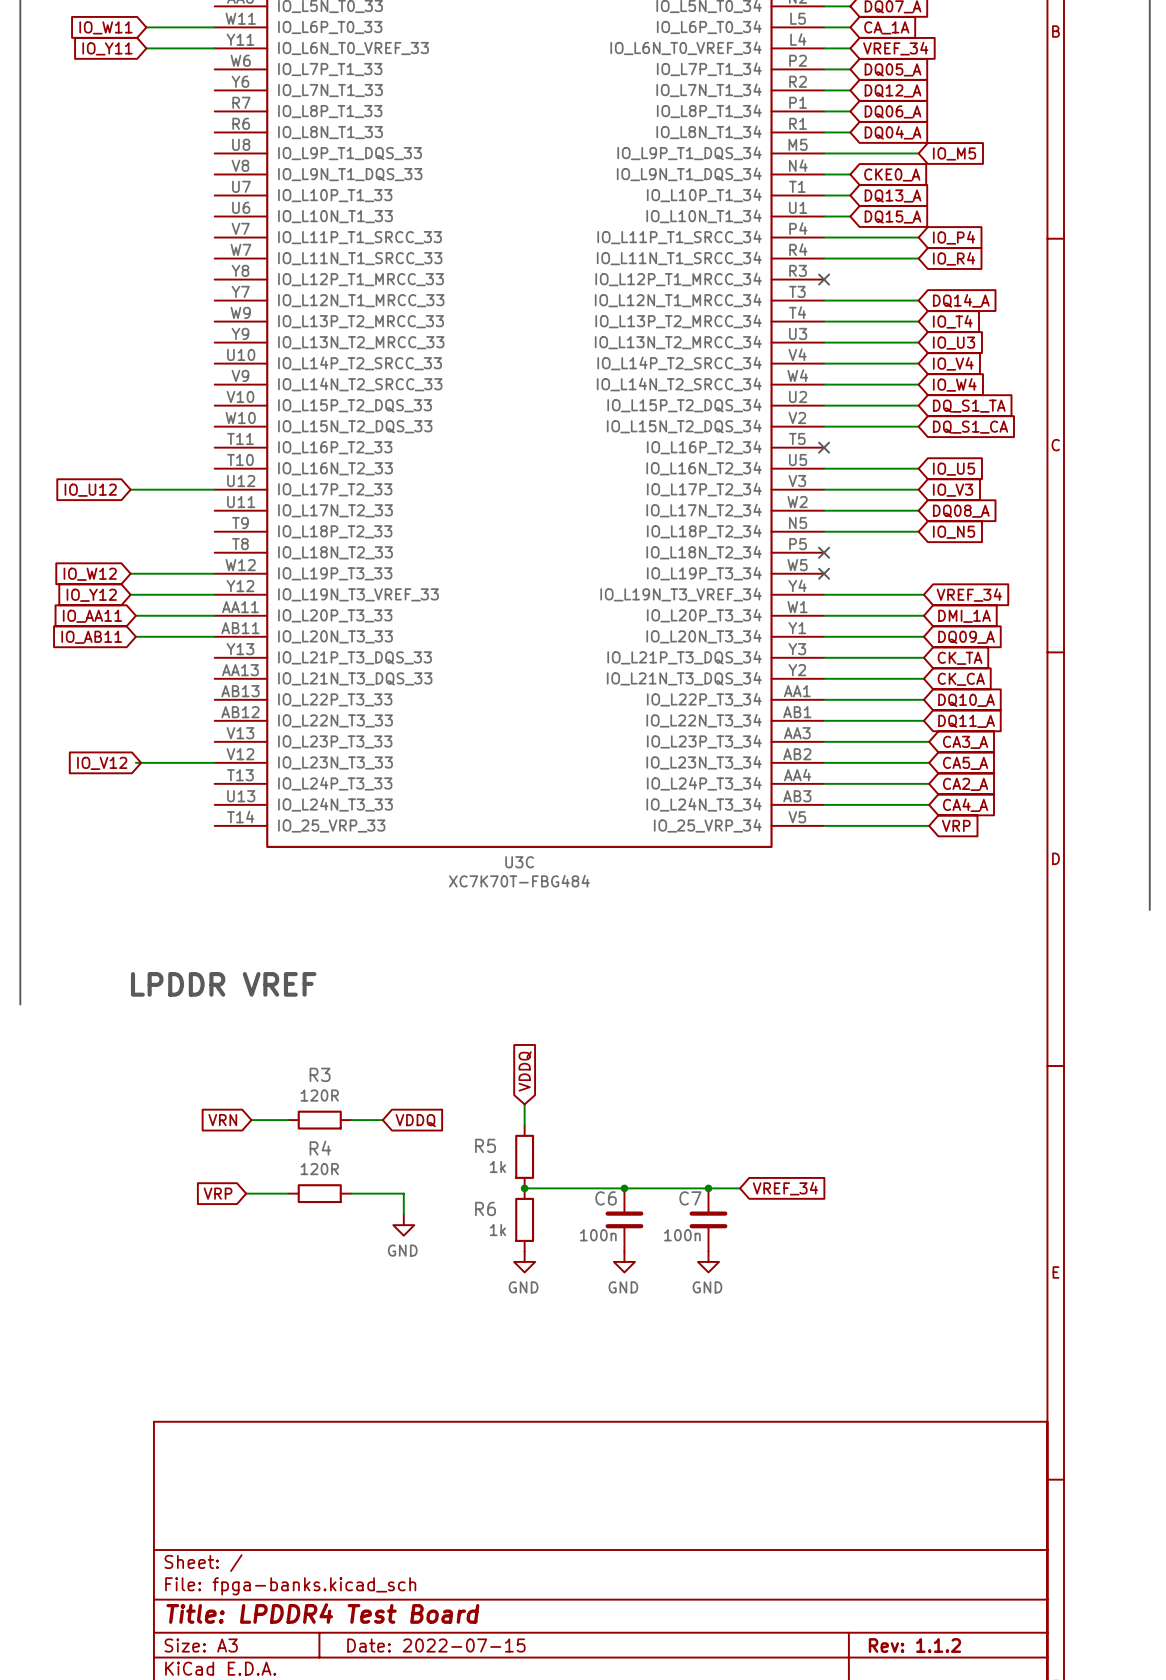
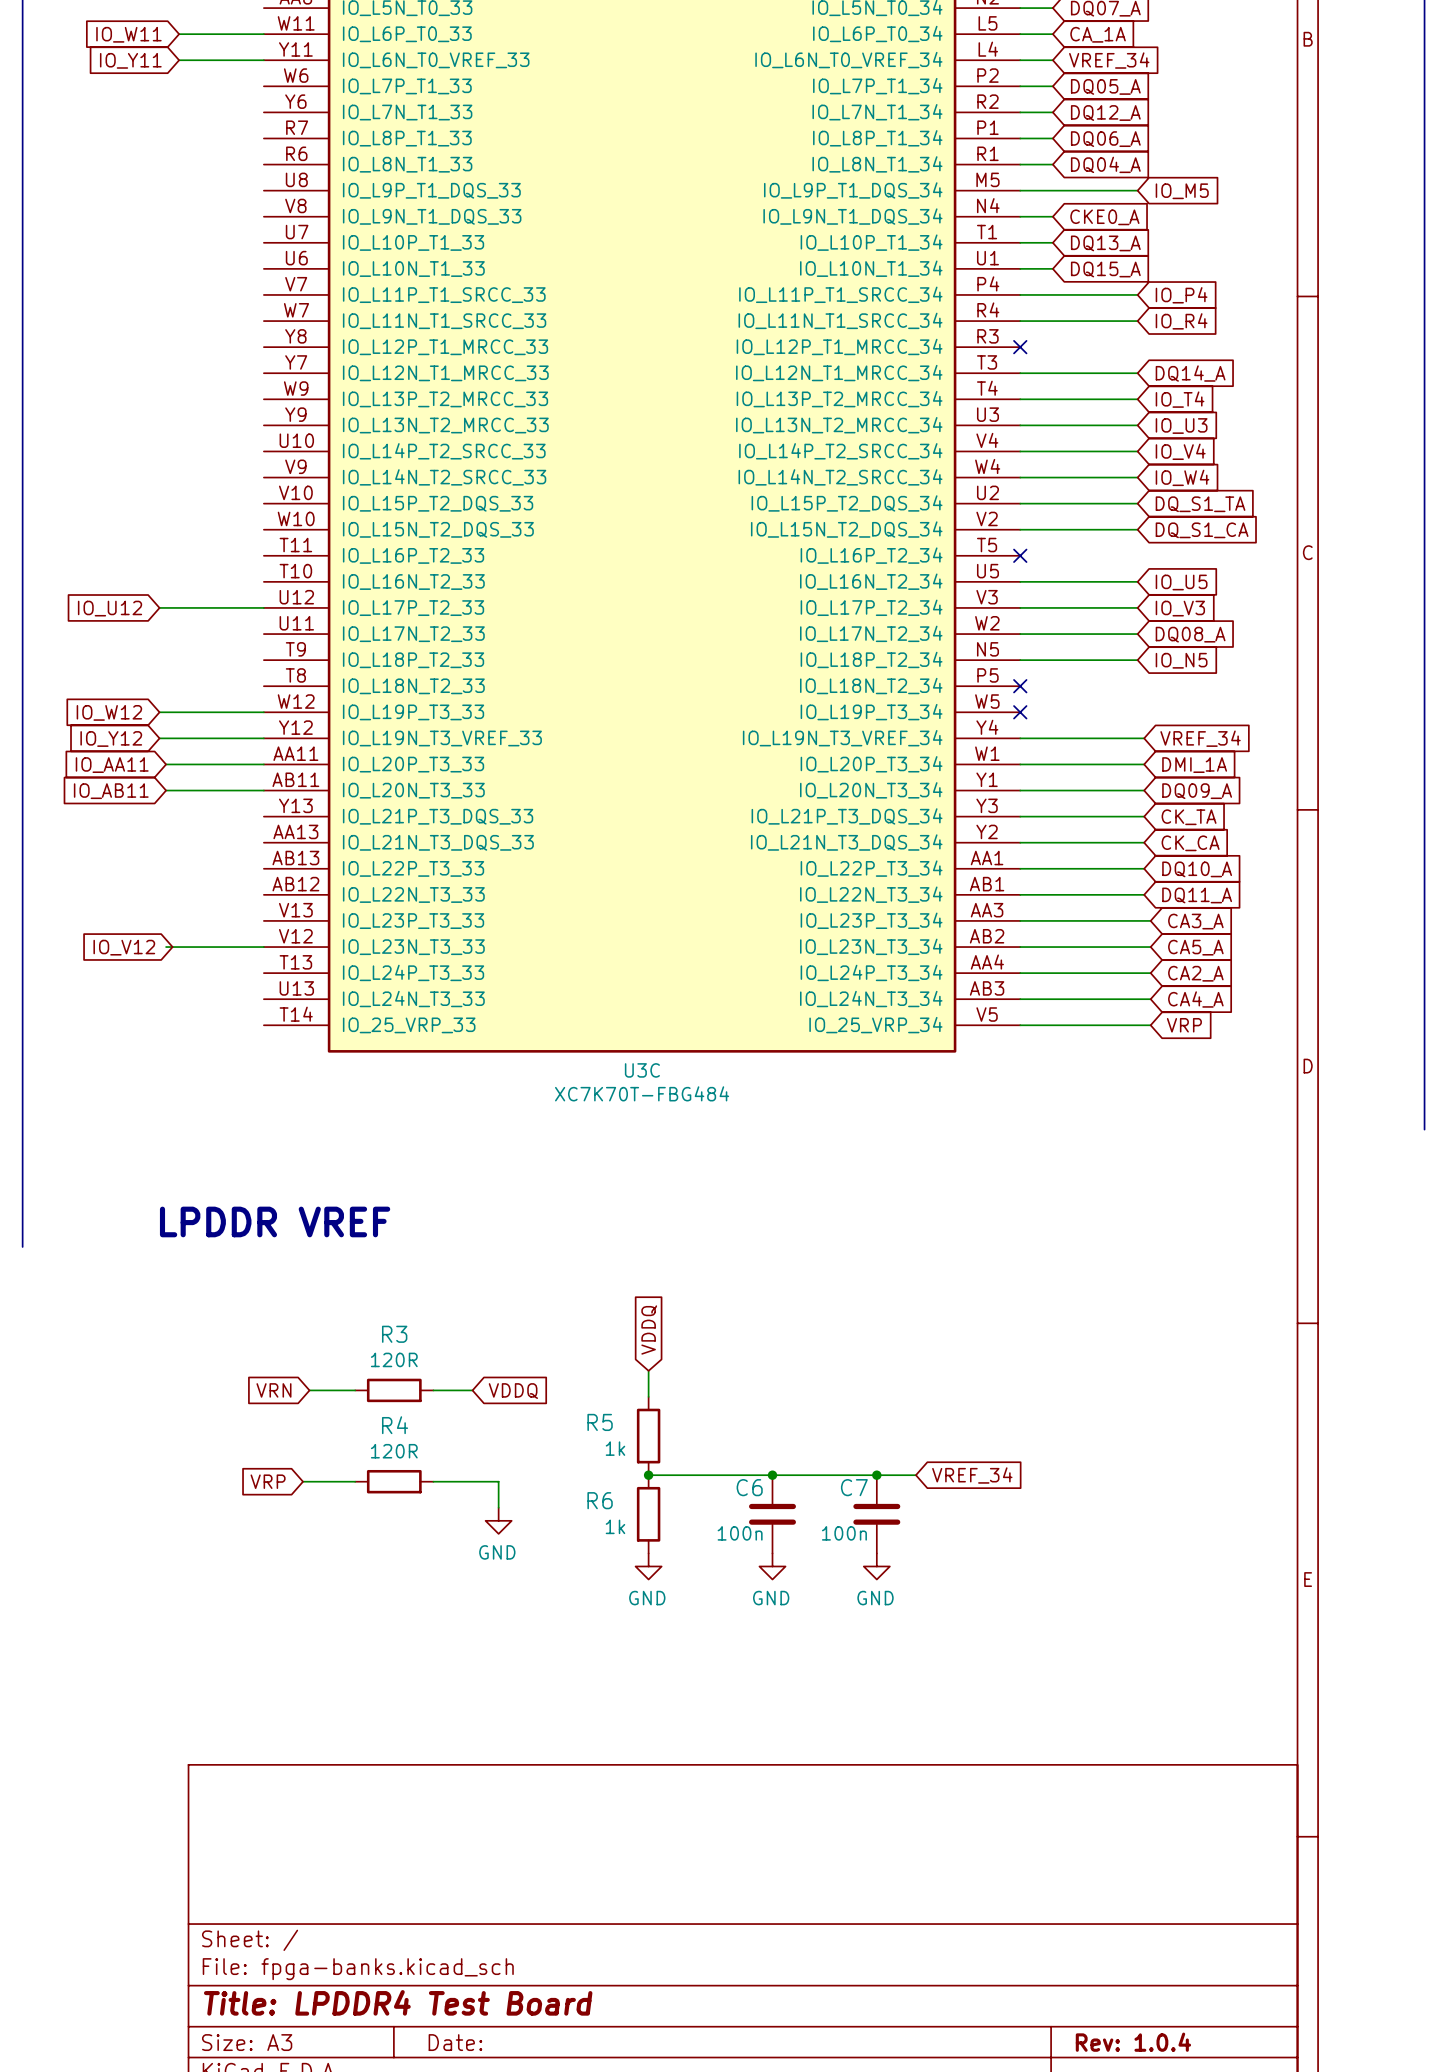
title block: Date: 2022-07-15 (436, 1645) -> Date: (455, 2042)
title block: Rev: 1.1.2 (914, 1645) -> Rev: 1.0.4 (1133, 2042)

